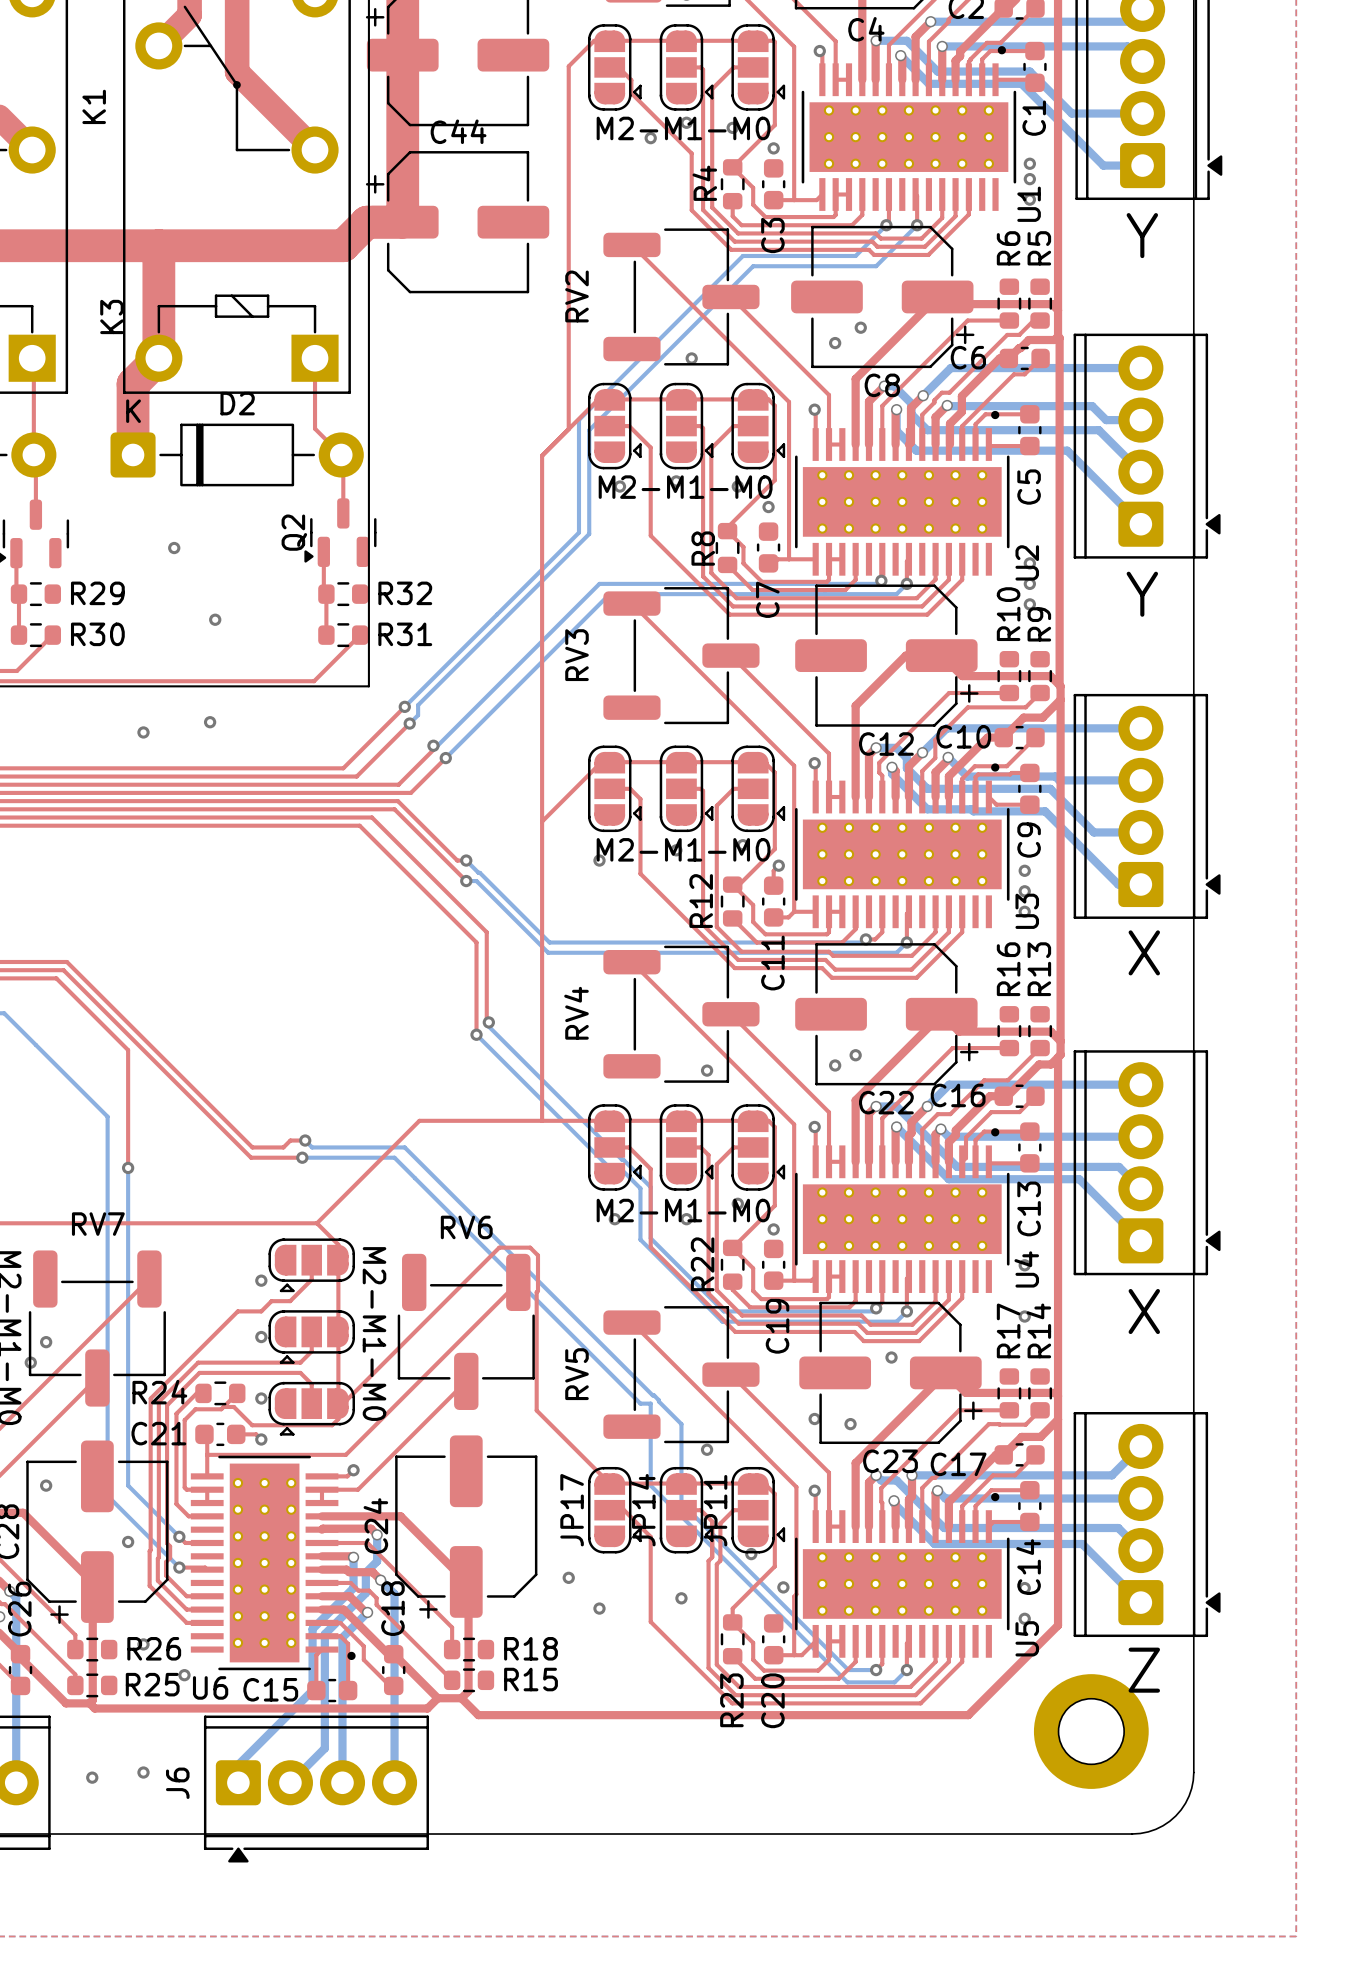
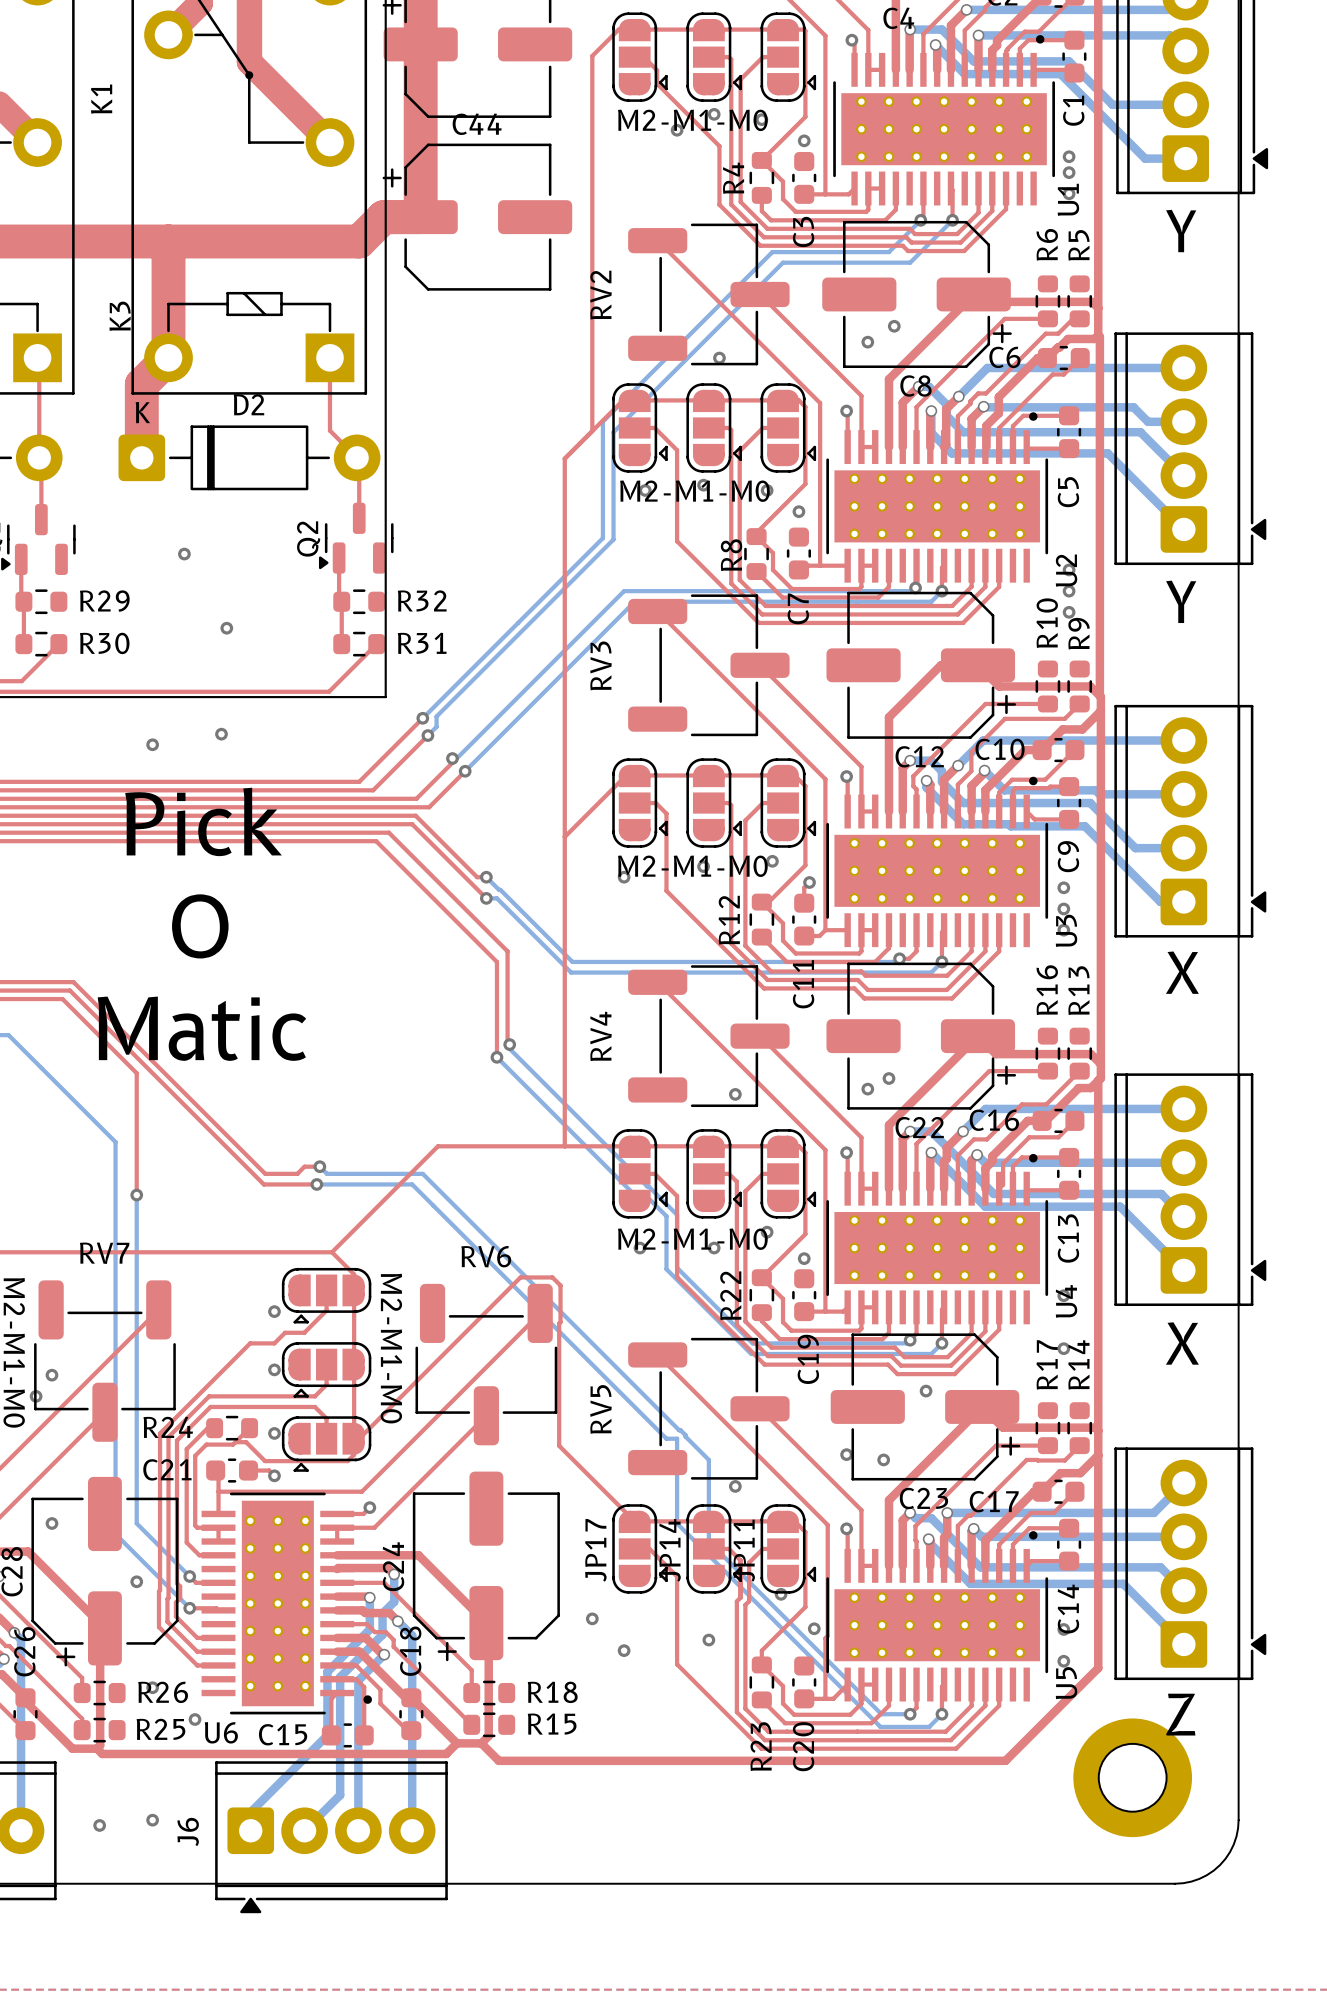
text: none -> Pick (203, 821)
text: none -> O (200, 926)
text: none -> Matic (201, 1028)

